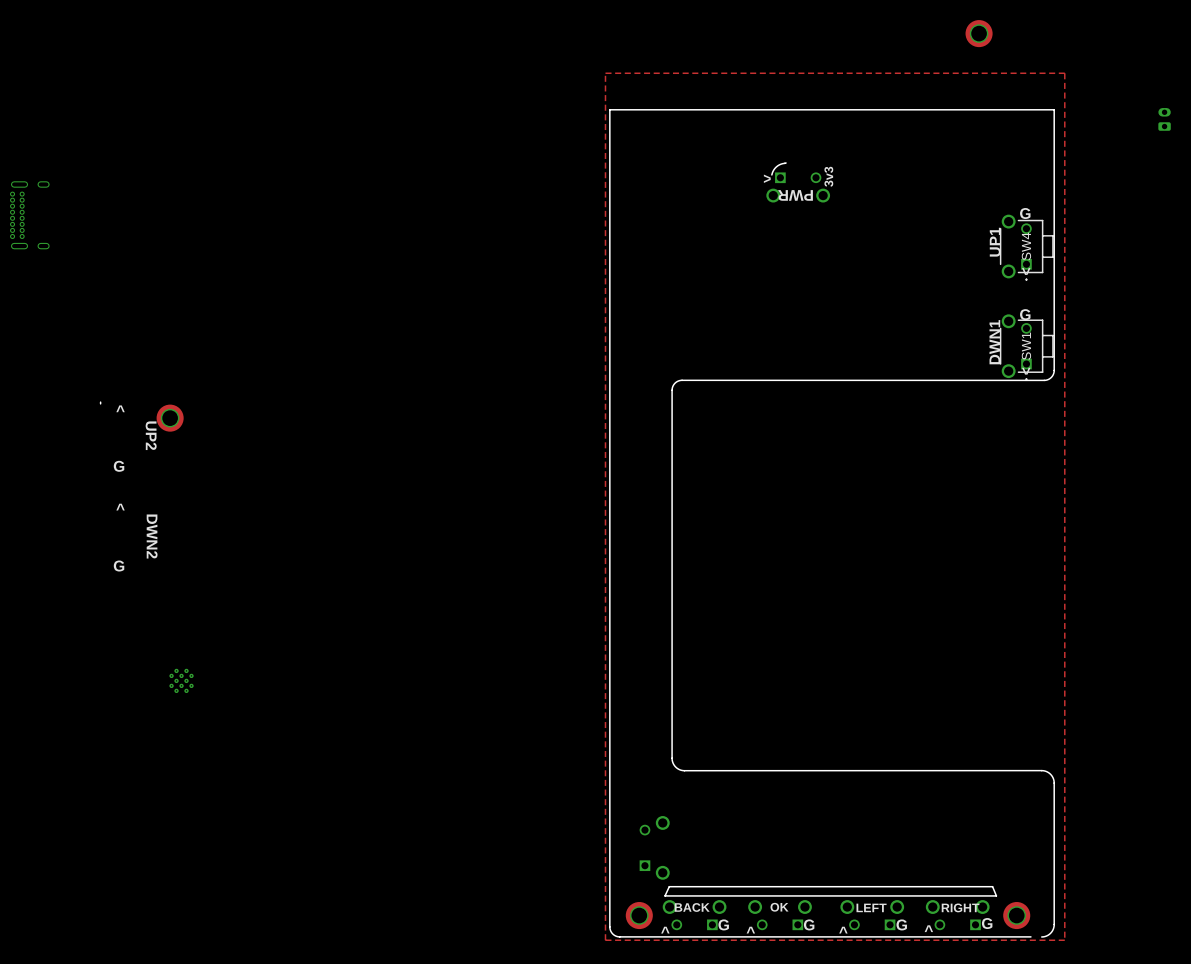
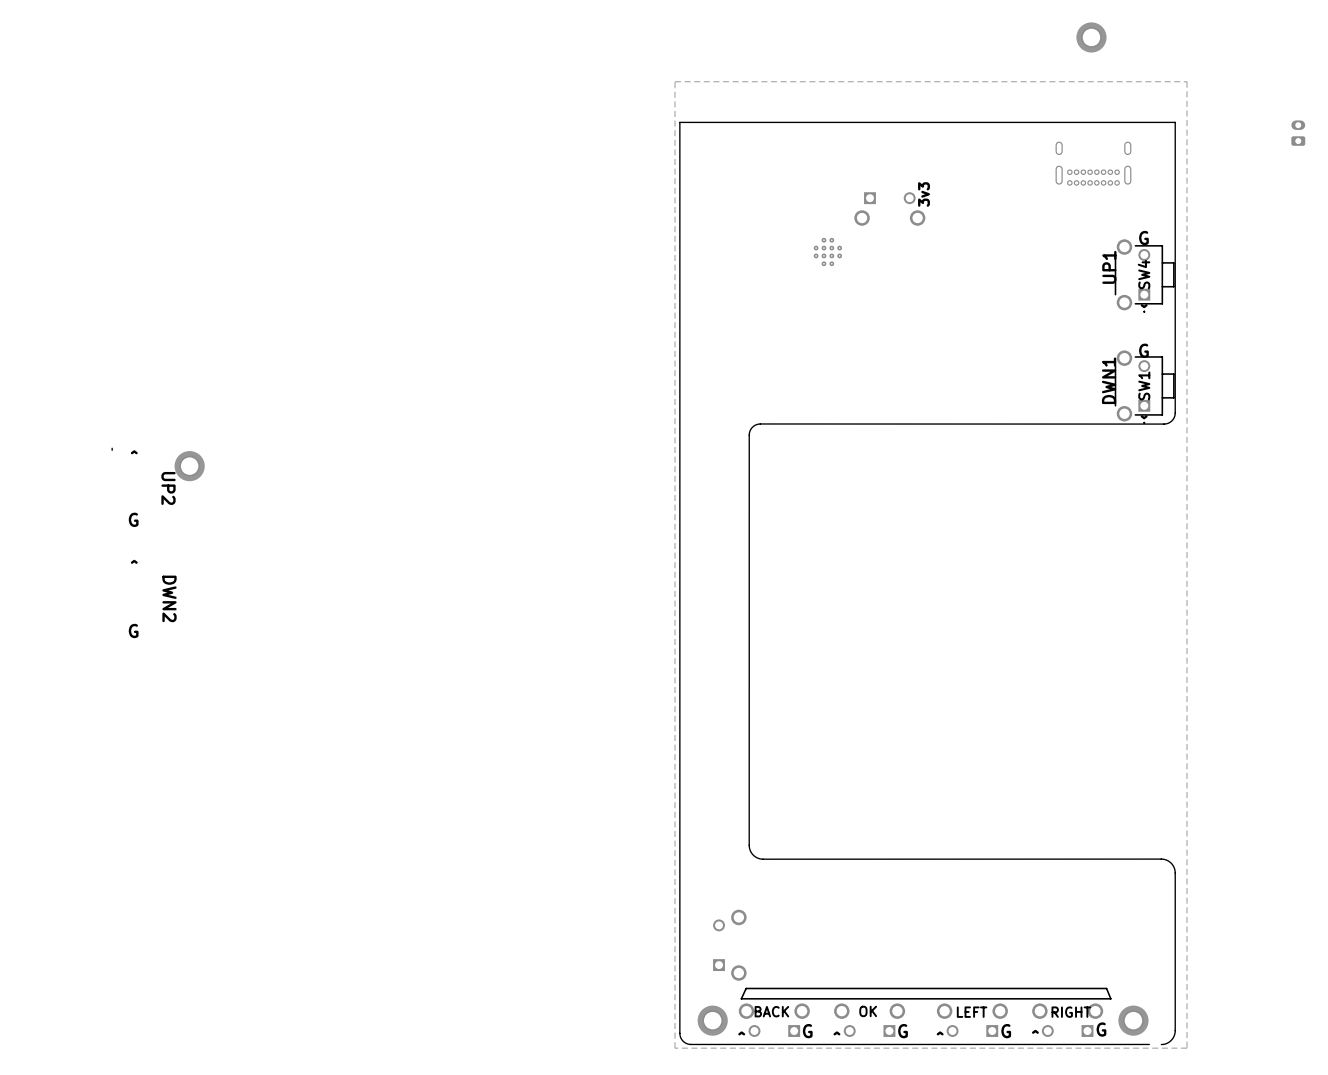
part: none -> (1093, 163)
board edge: (786, 162) (776, 166) (771, 174) -> none
text: ^ (767, 178) -> none
text: PWR (795, 195) -> none
part: (29, 215) -> none
part: none -> (827, 252)
part: (181, 680) -> none

